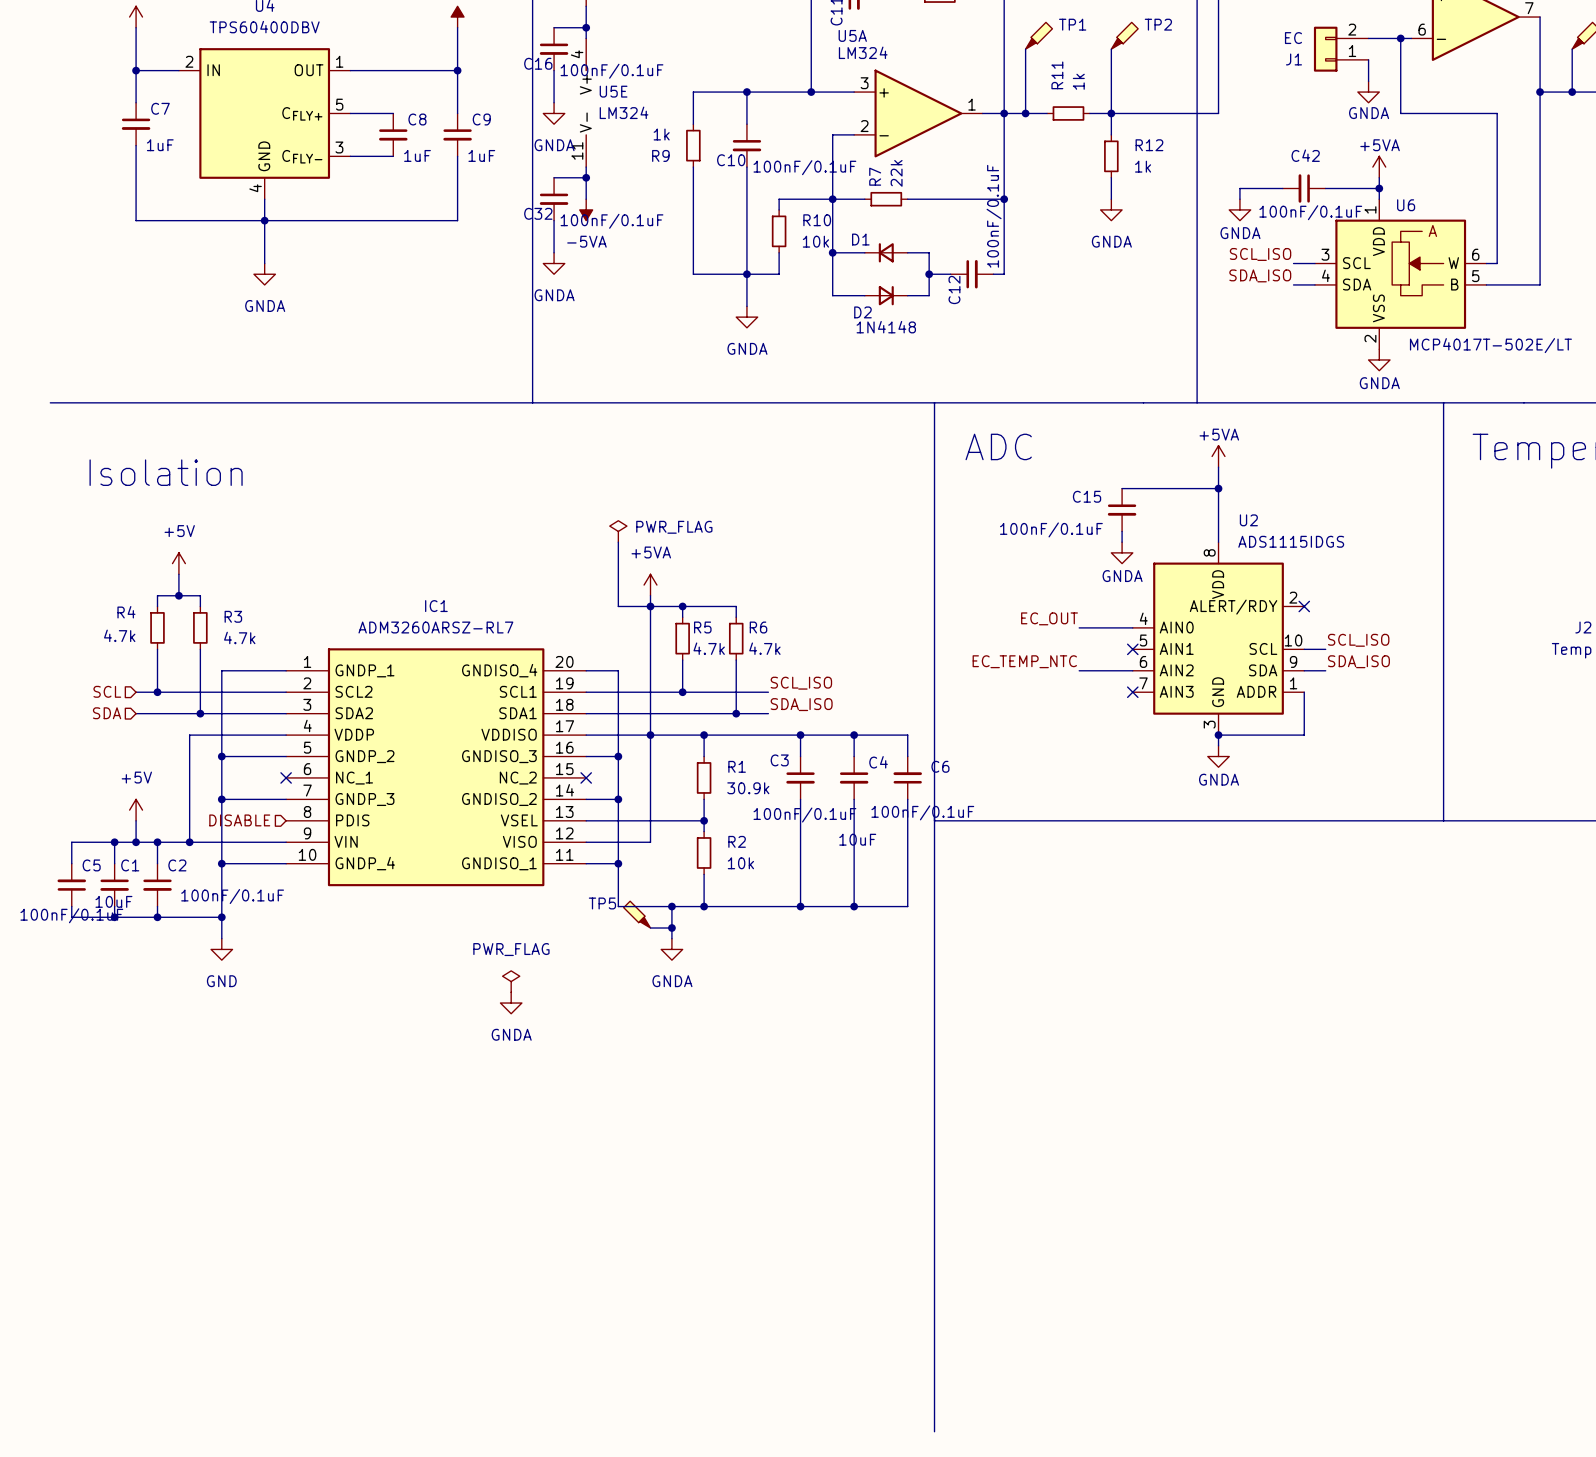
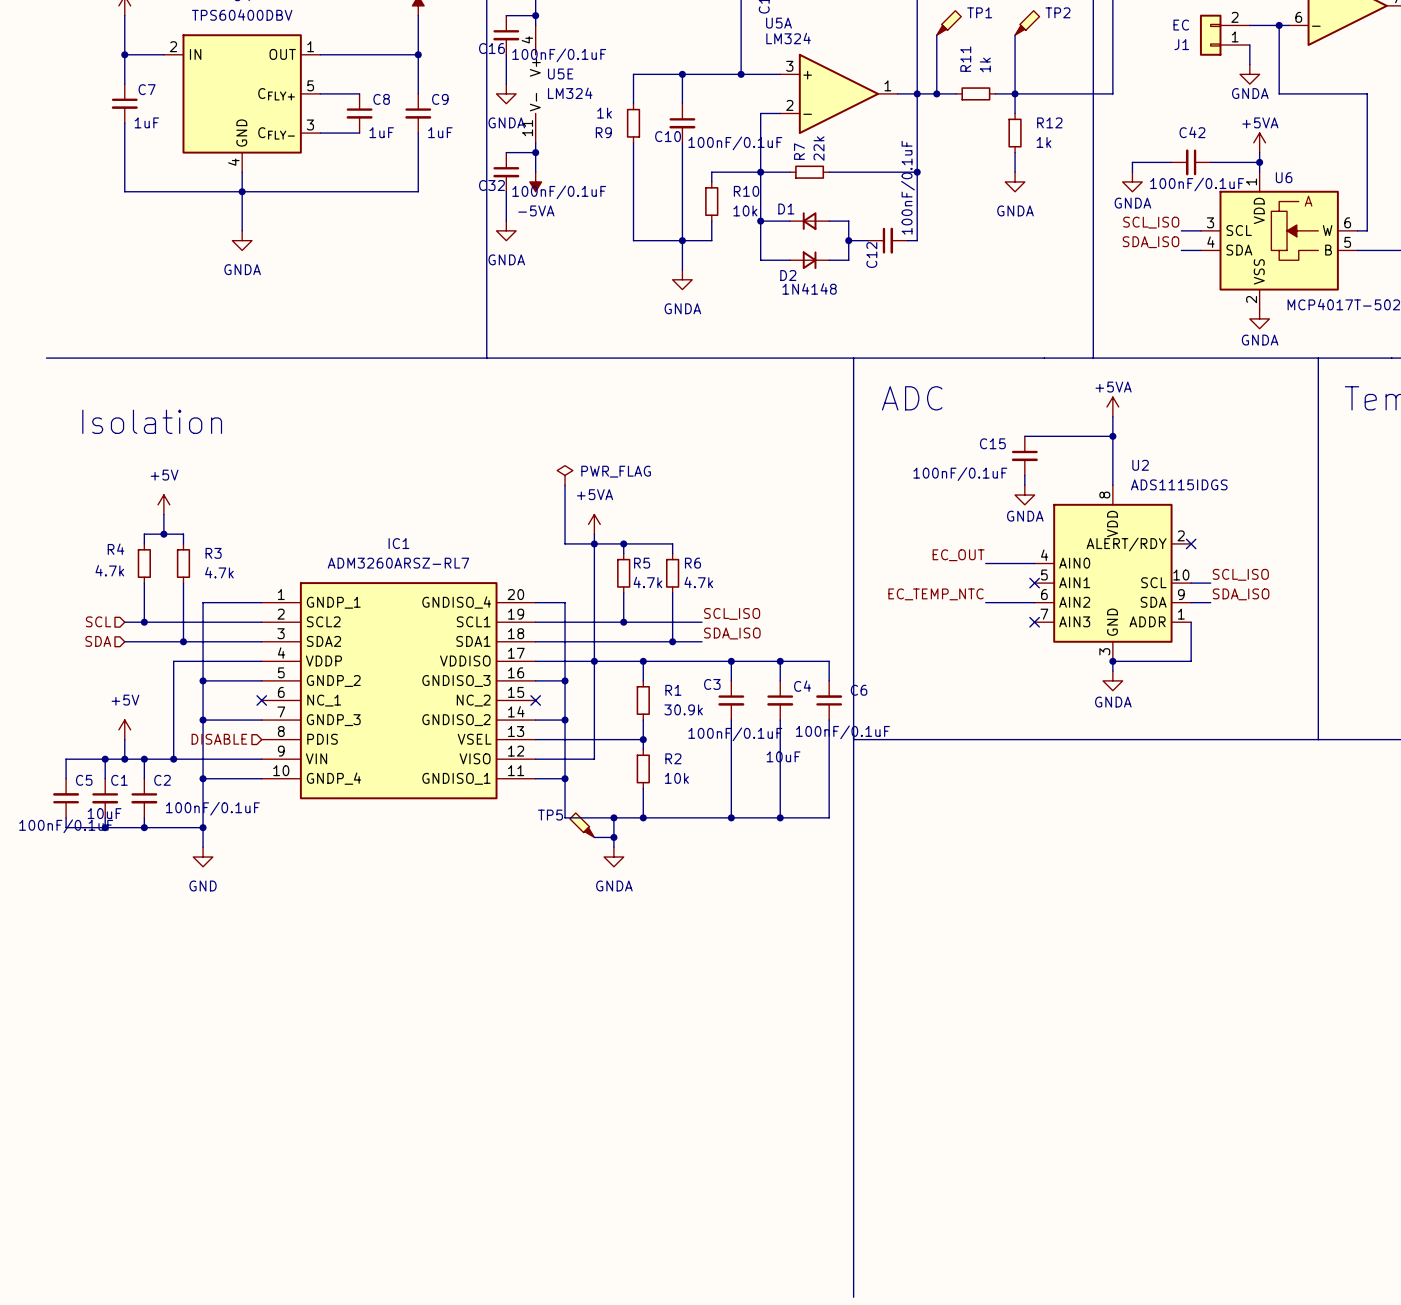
power symbol: PWR_FLAG (511, 981) -> none
power symbol: GNDA (511, 1003) -> none

